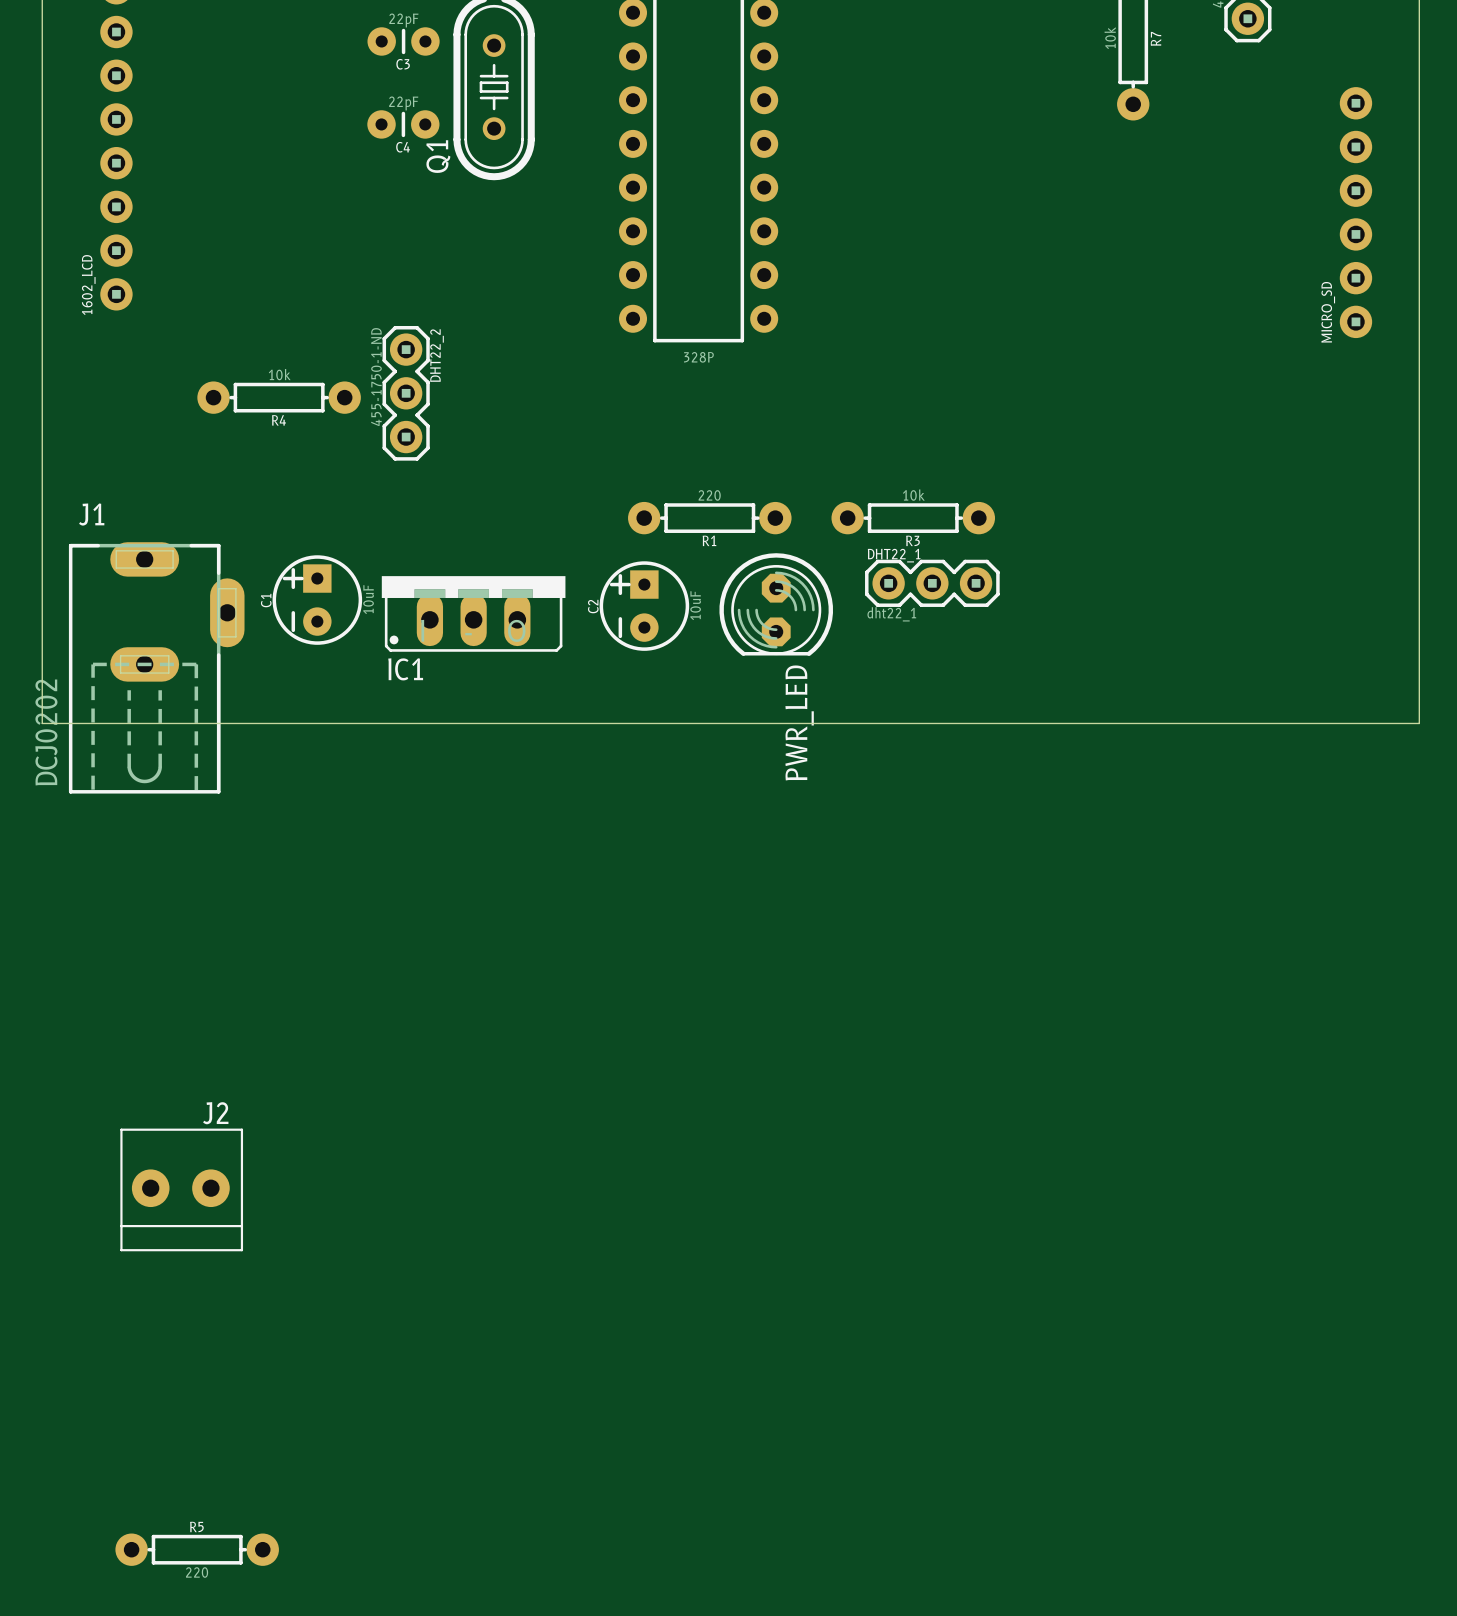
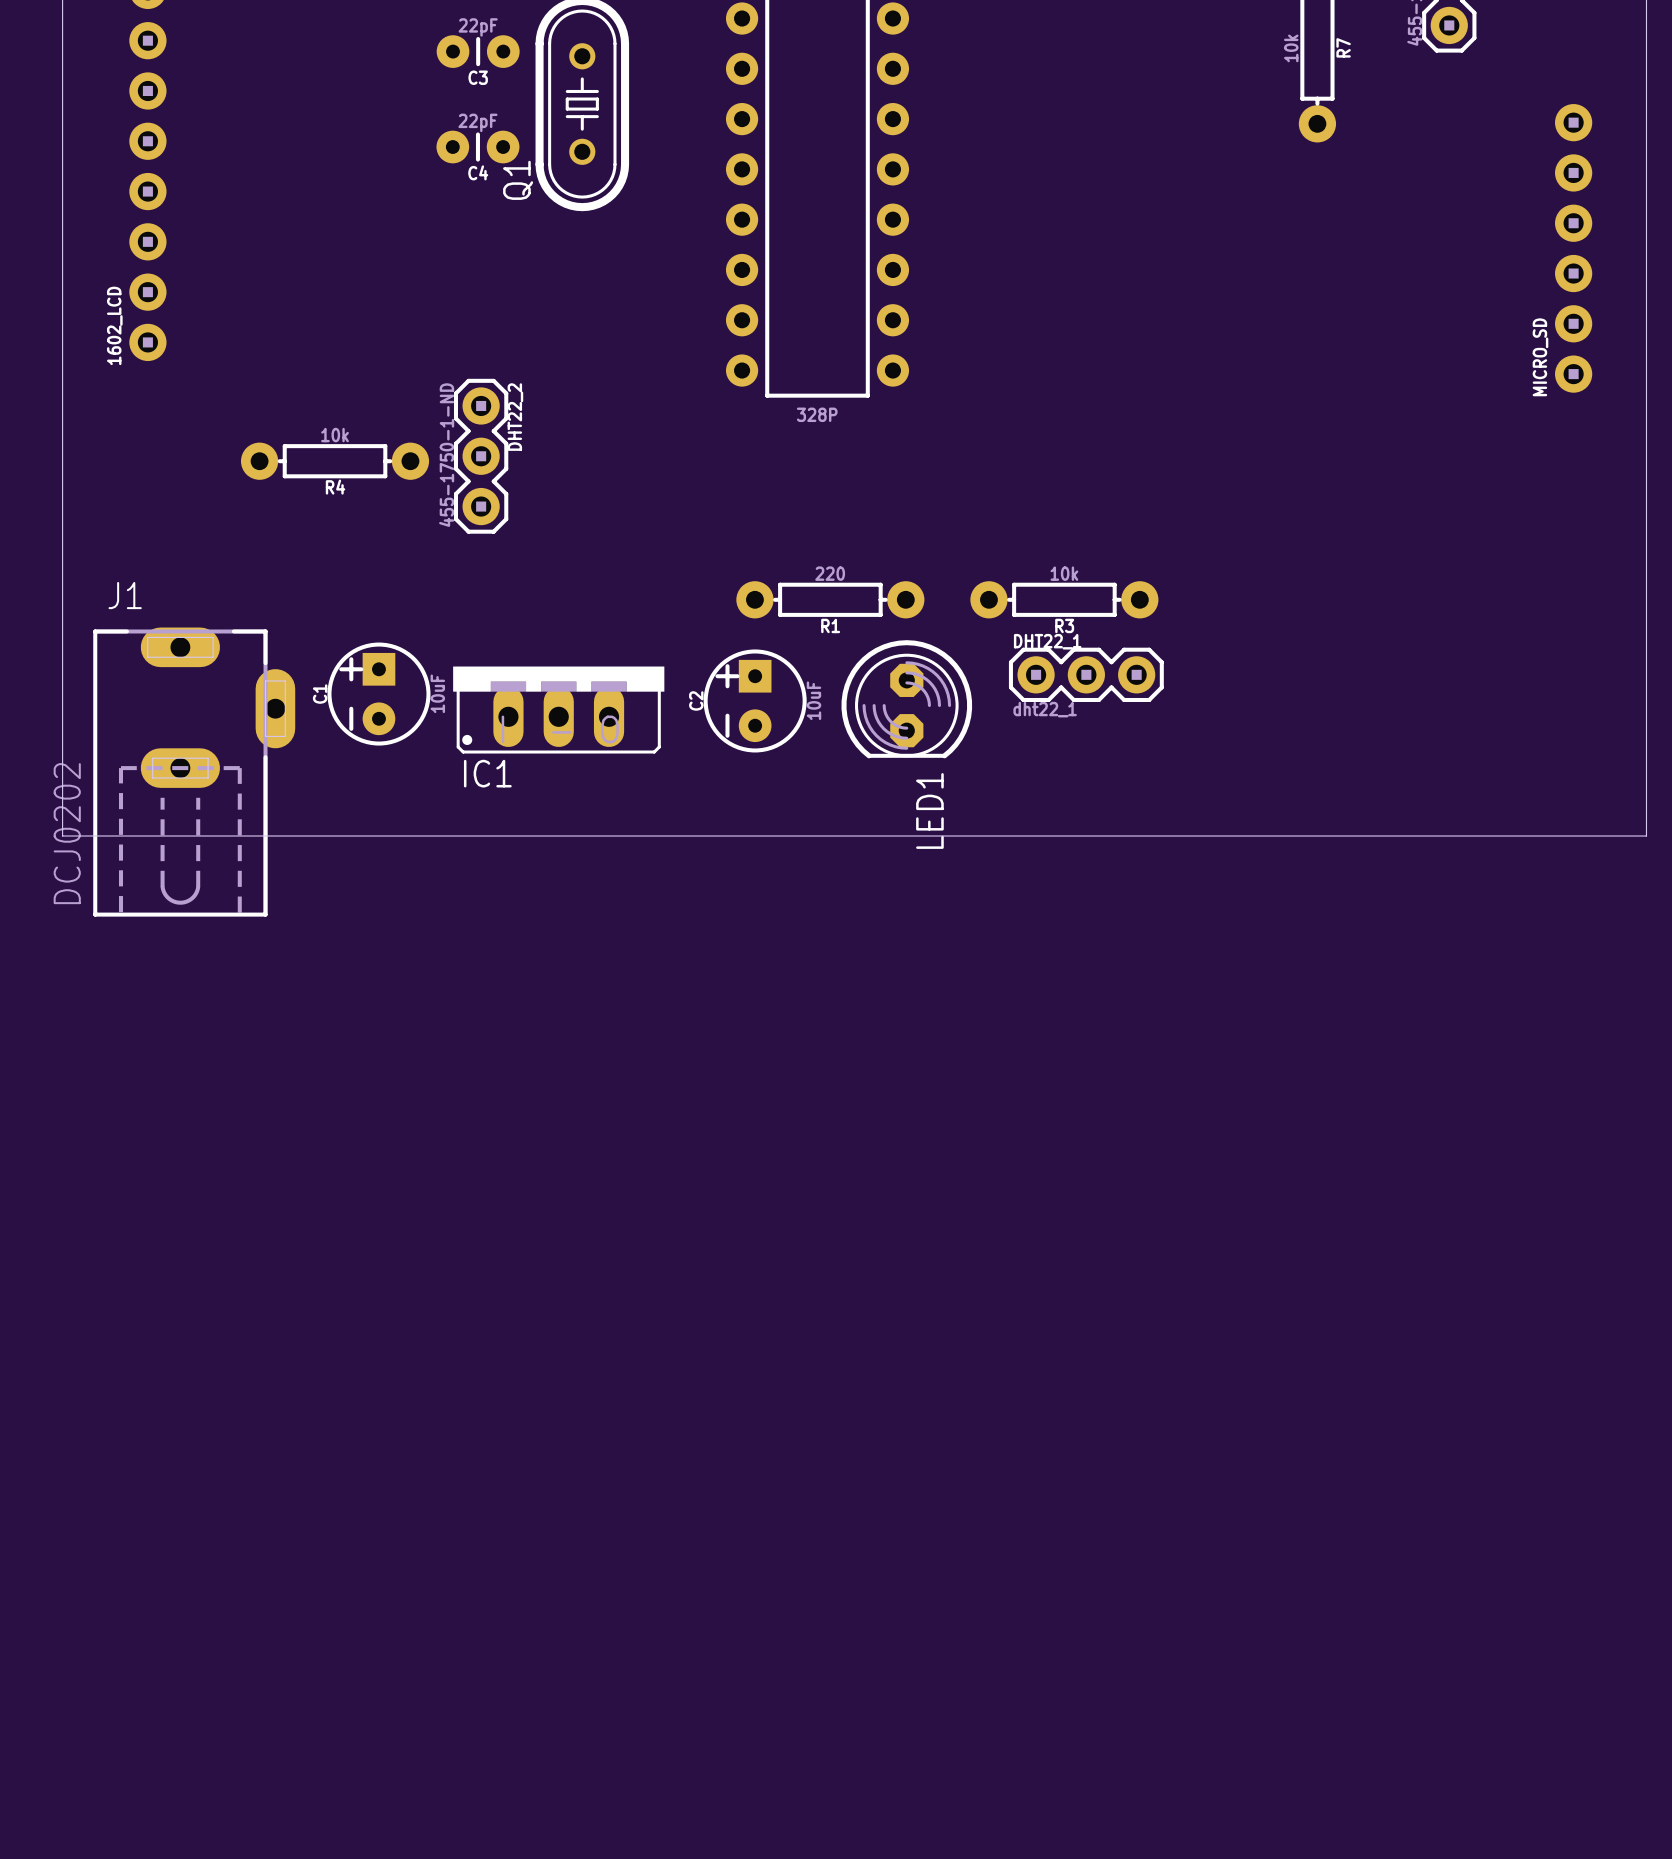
PWR_LED name: PWR_LED (799, 722) -> LED1 (929, 810)
J2: (181, 1189) -> none
R5: 220 (197, 1549) -> none

